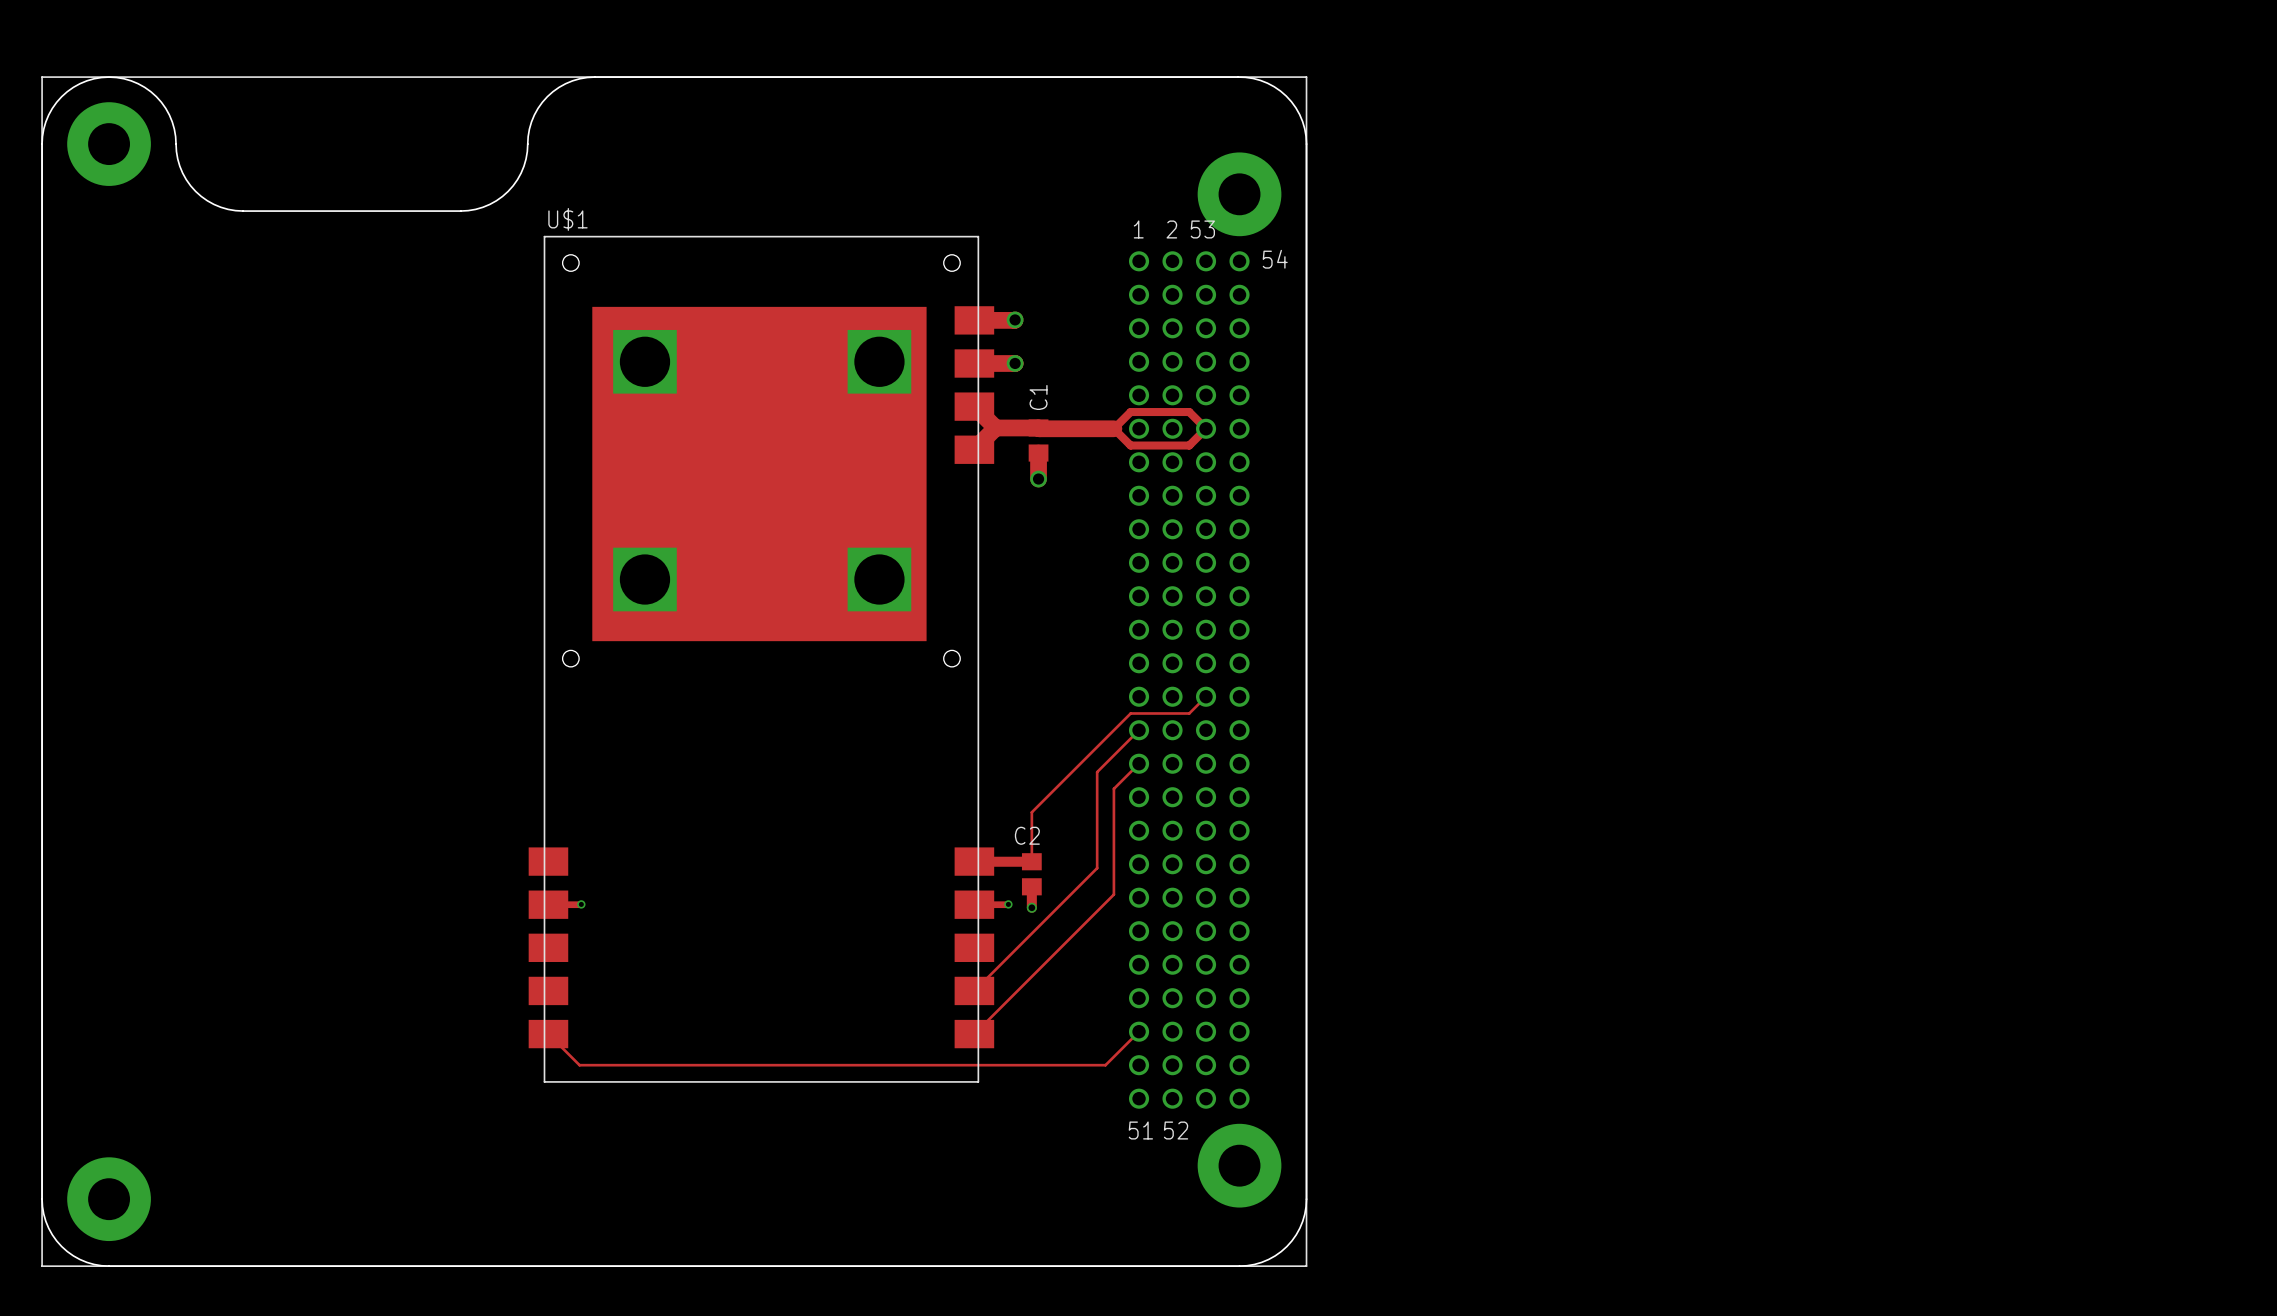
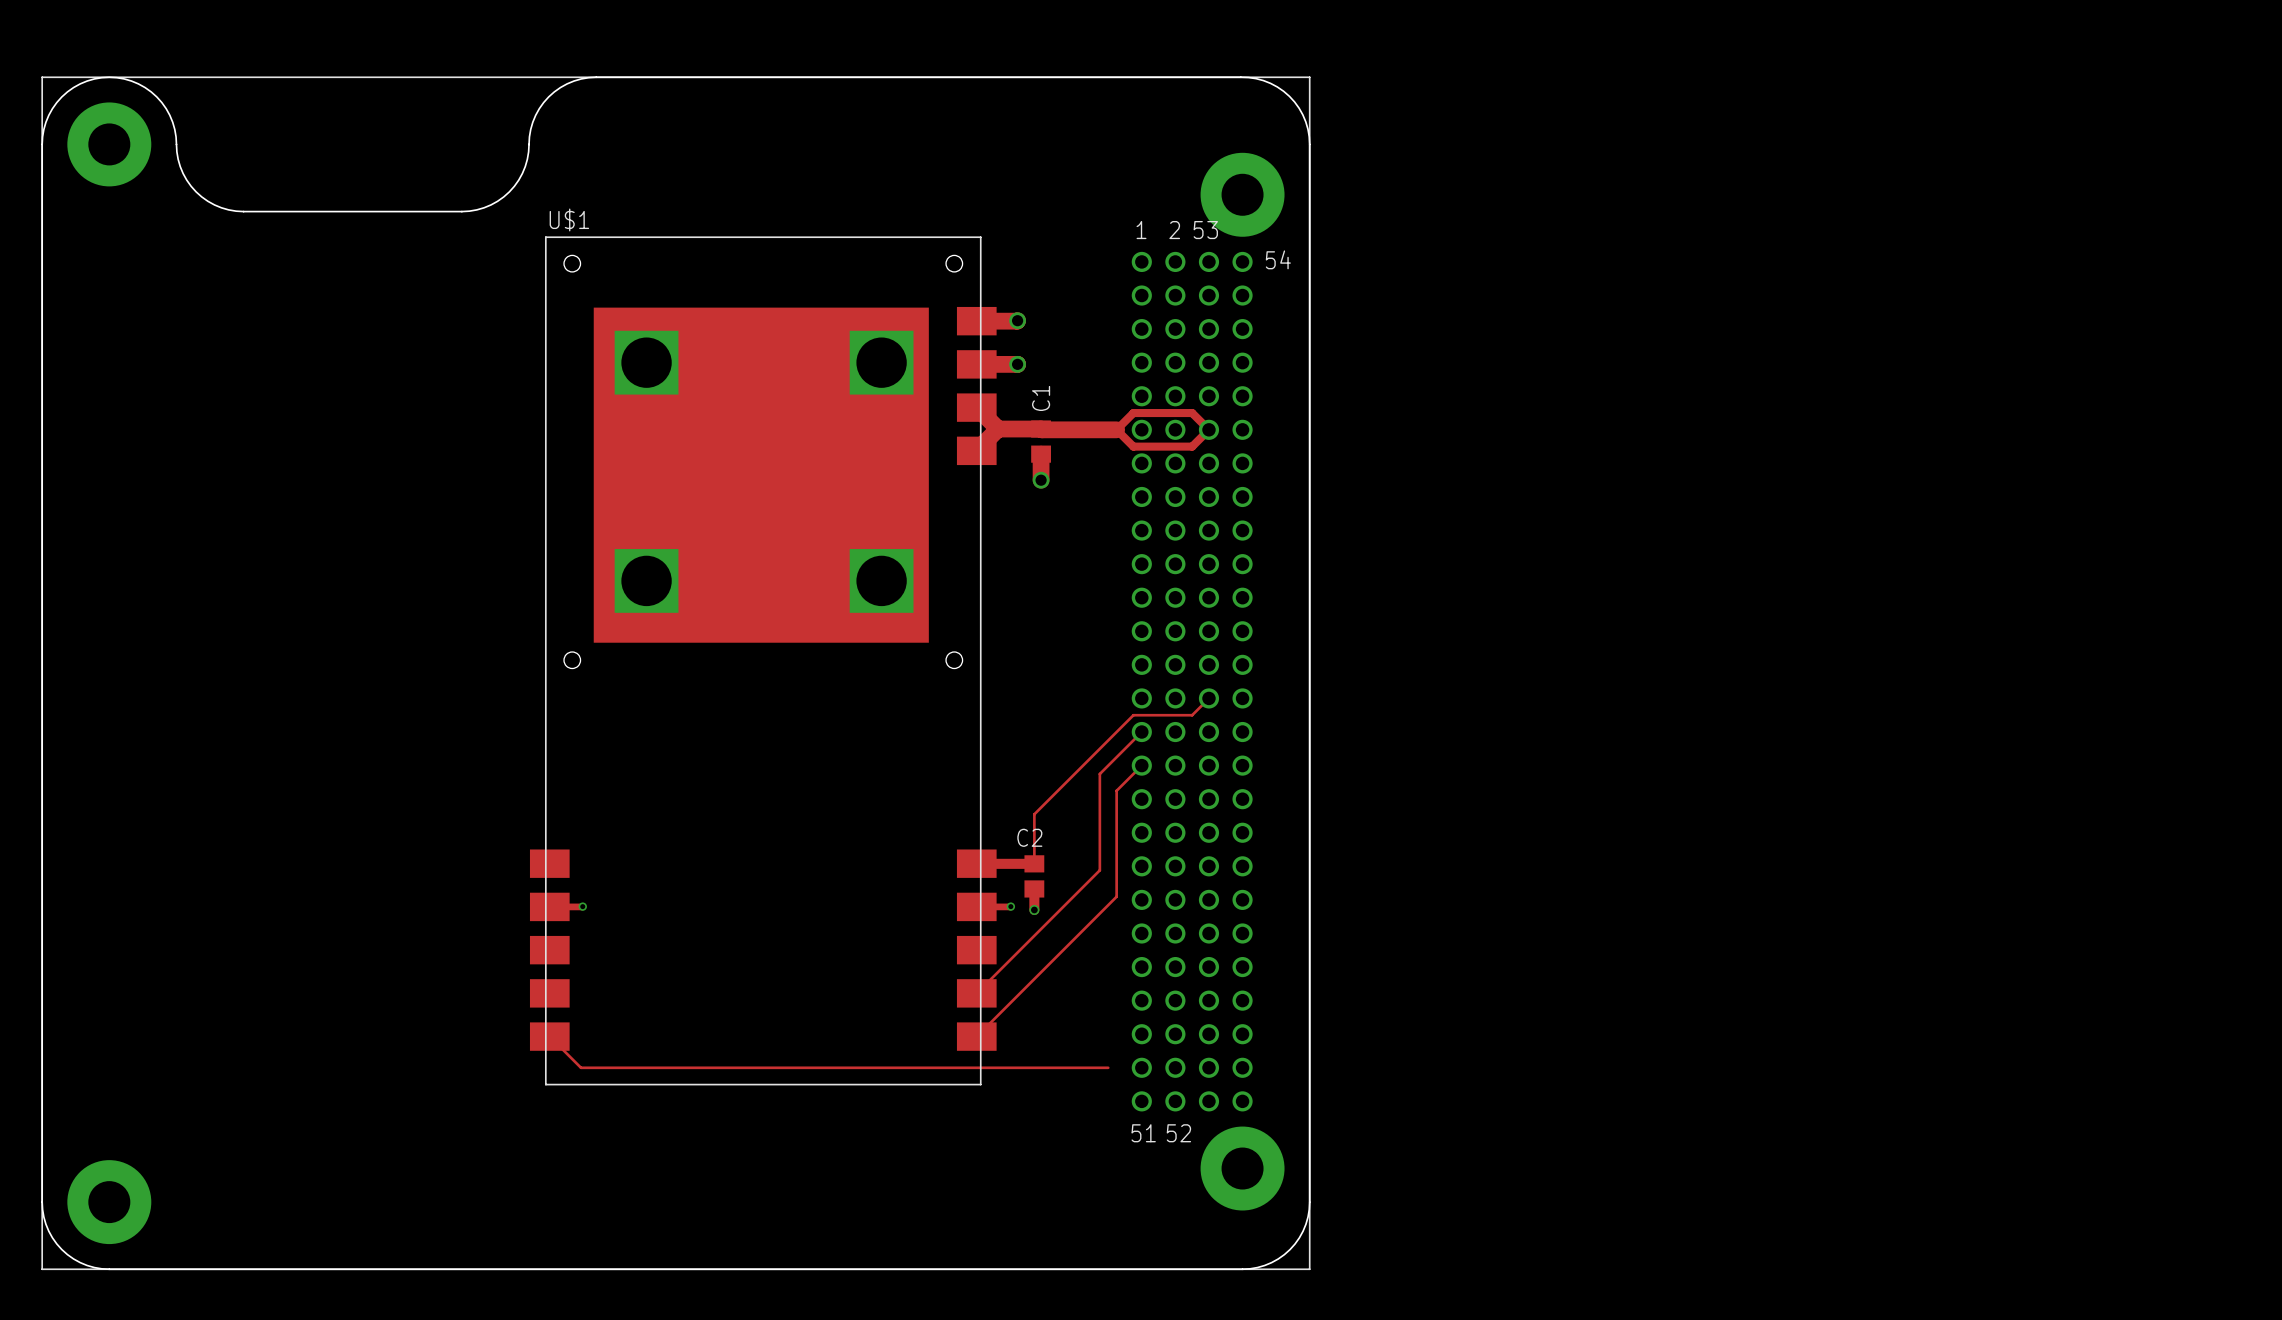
track: (1139, 1031) (1105, 1065) -> none

